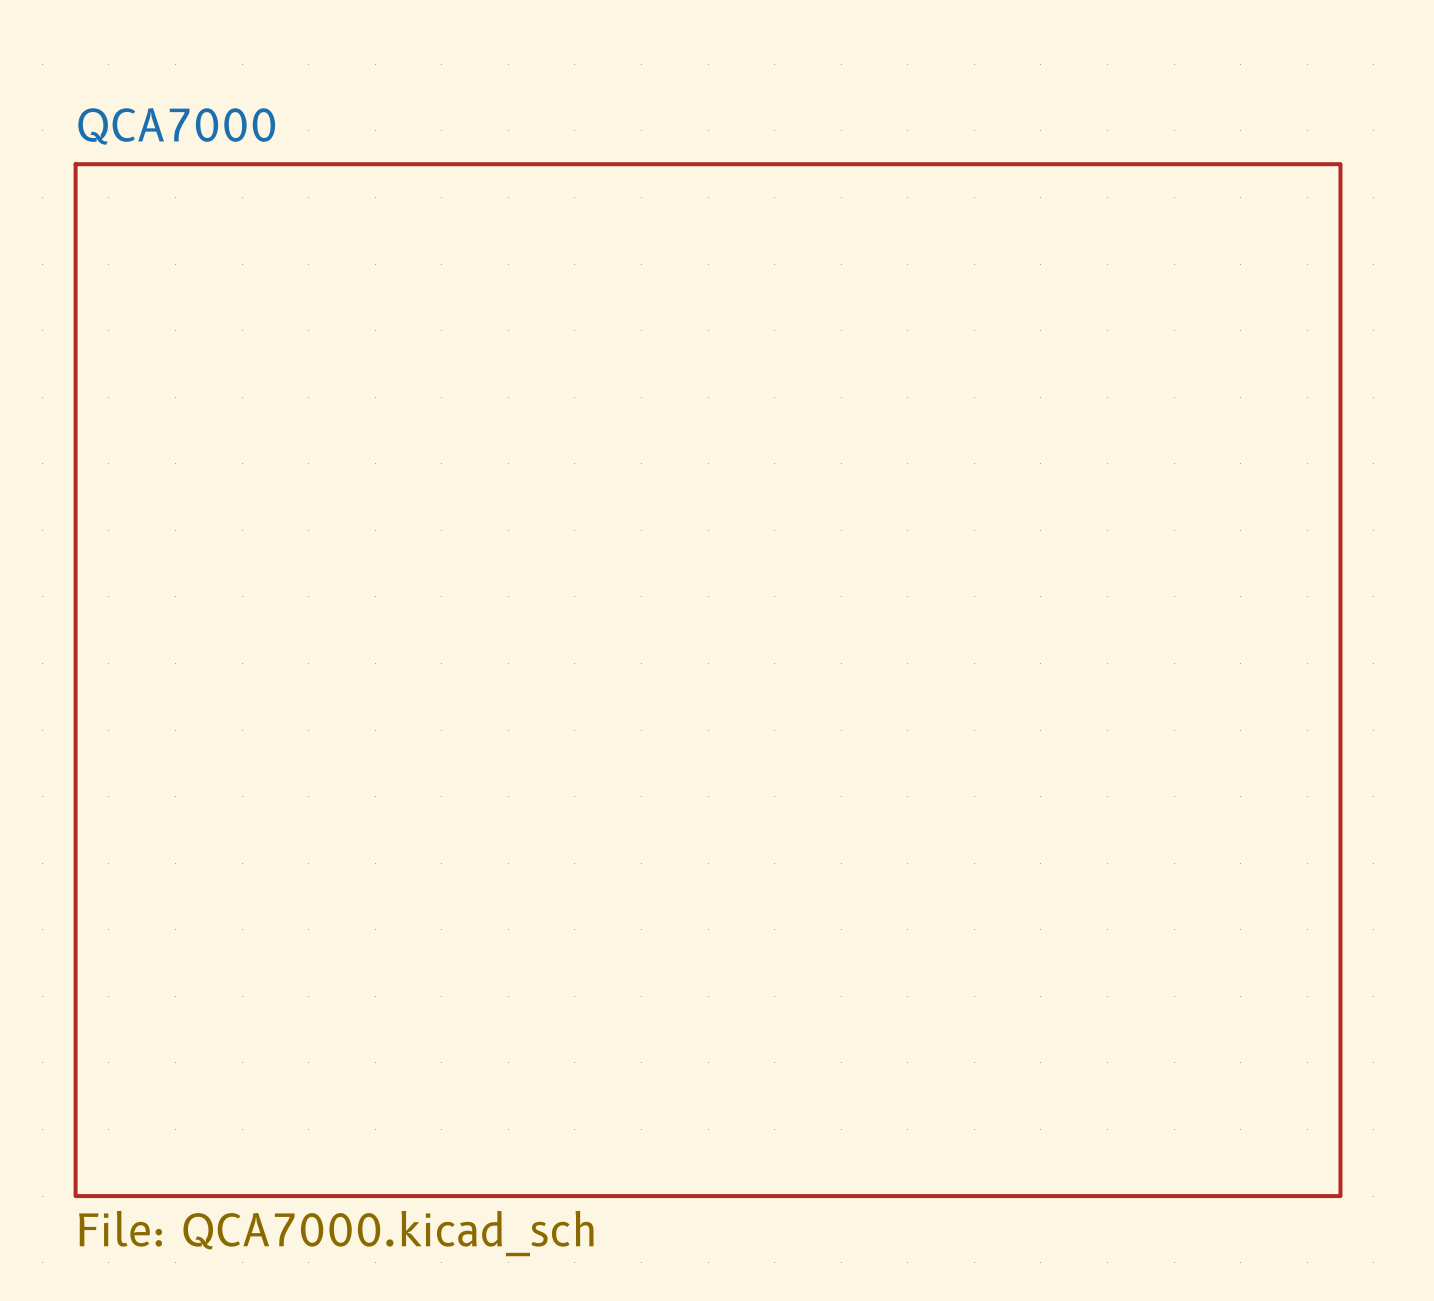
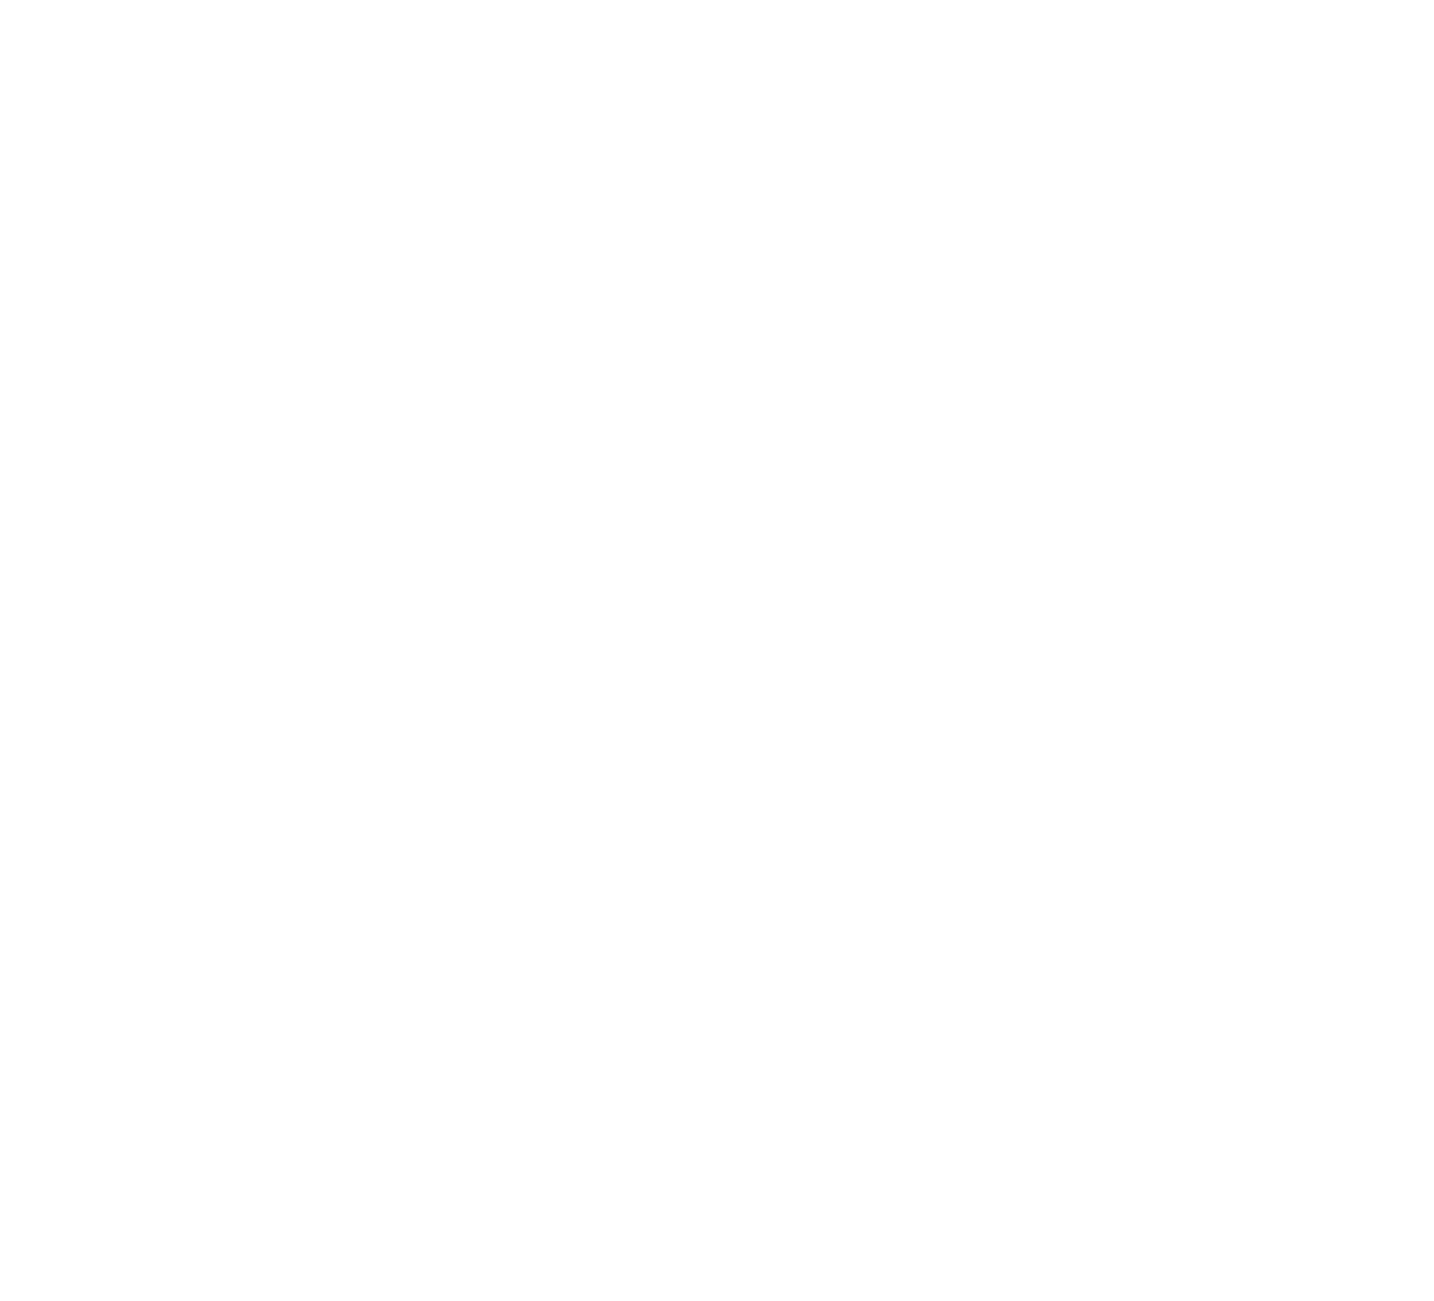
sheet QCA7000: File: QCA7000.kicad_sch (708, 680) -> none

